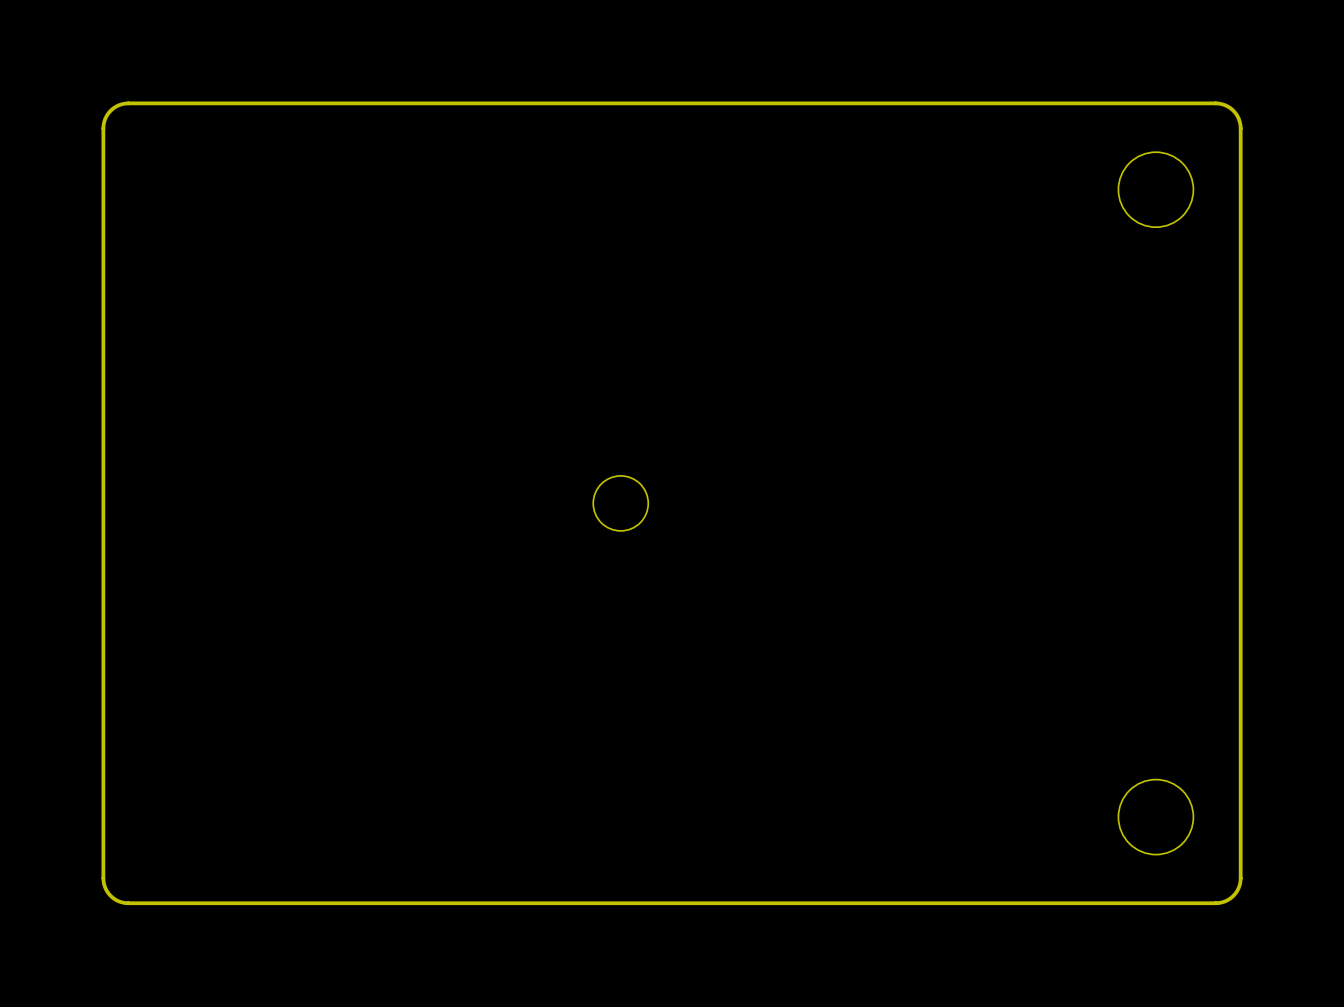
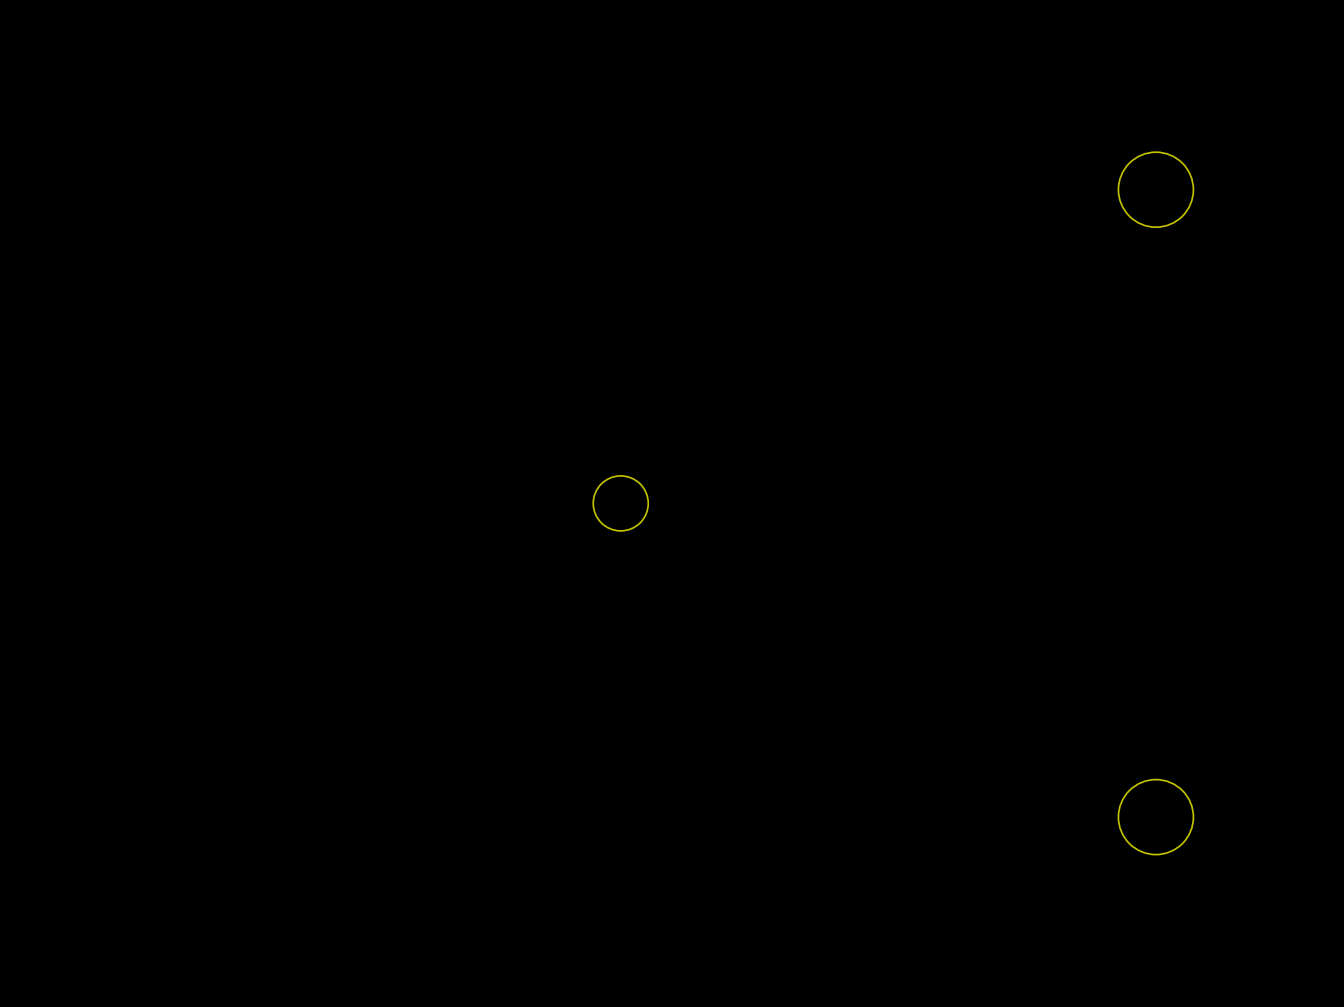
board edge: (1215, 103) (128, 103) (113, 108) (106, 115) (103, 128) (103, 878) (108, 893) (118, 901) (128, 903) (1215, 903) (1230, 898) (1238, 887) (1240, 878) (1240, 128) (1238, 118) (1233, 110) (1225, 105) (1215, 103) -> none

